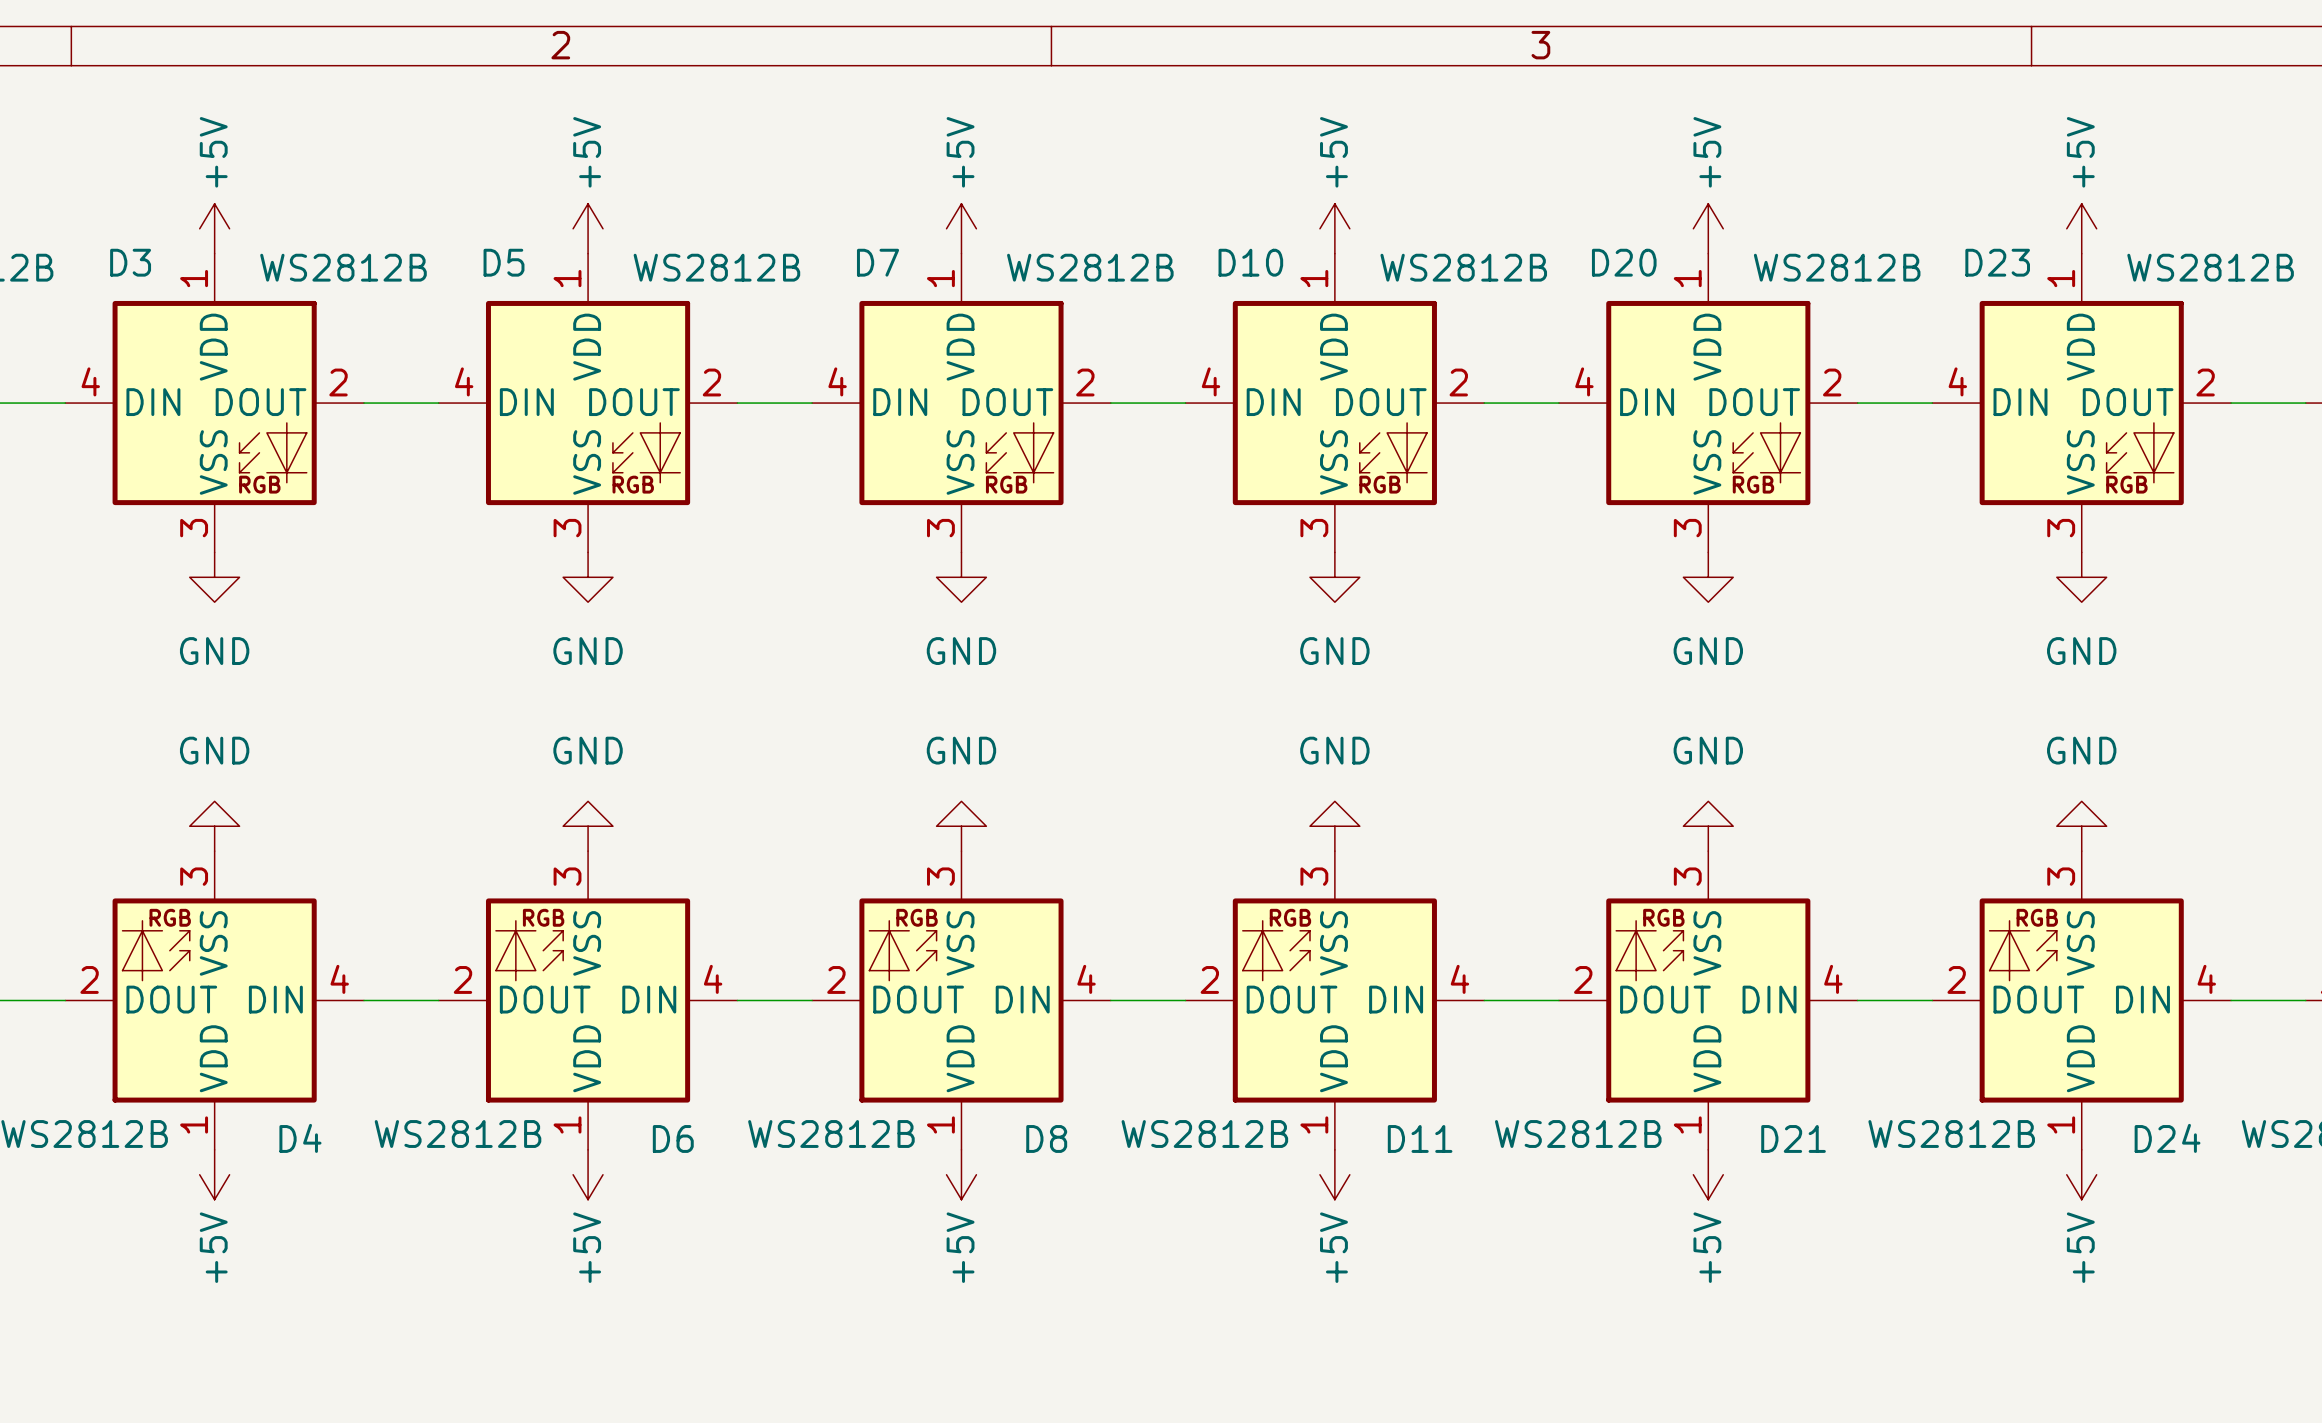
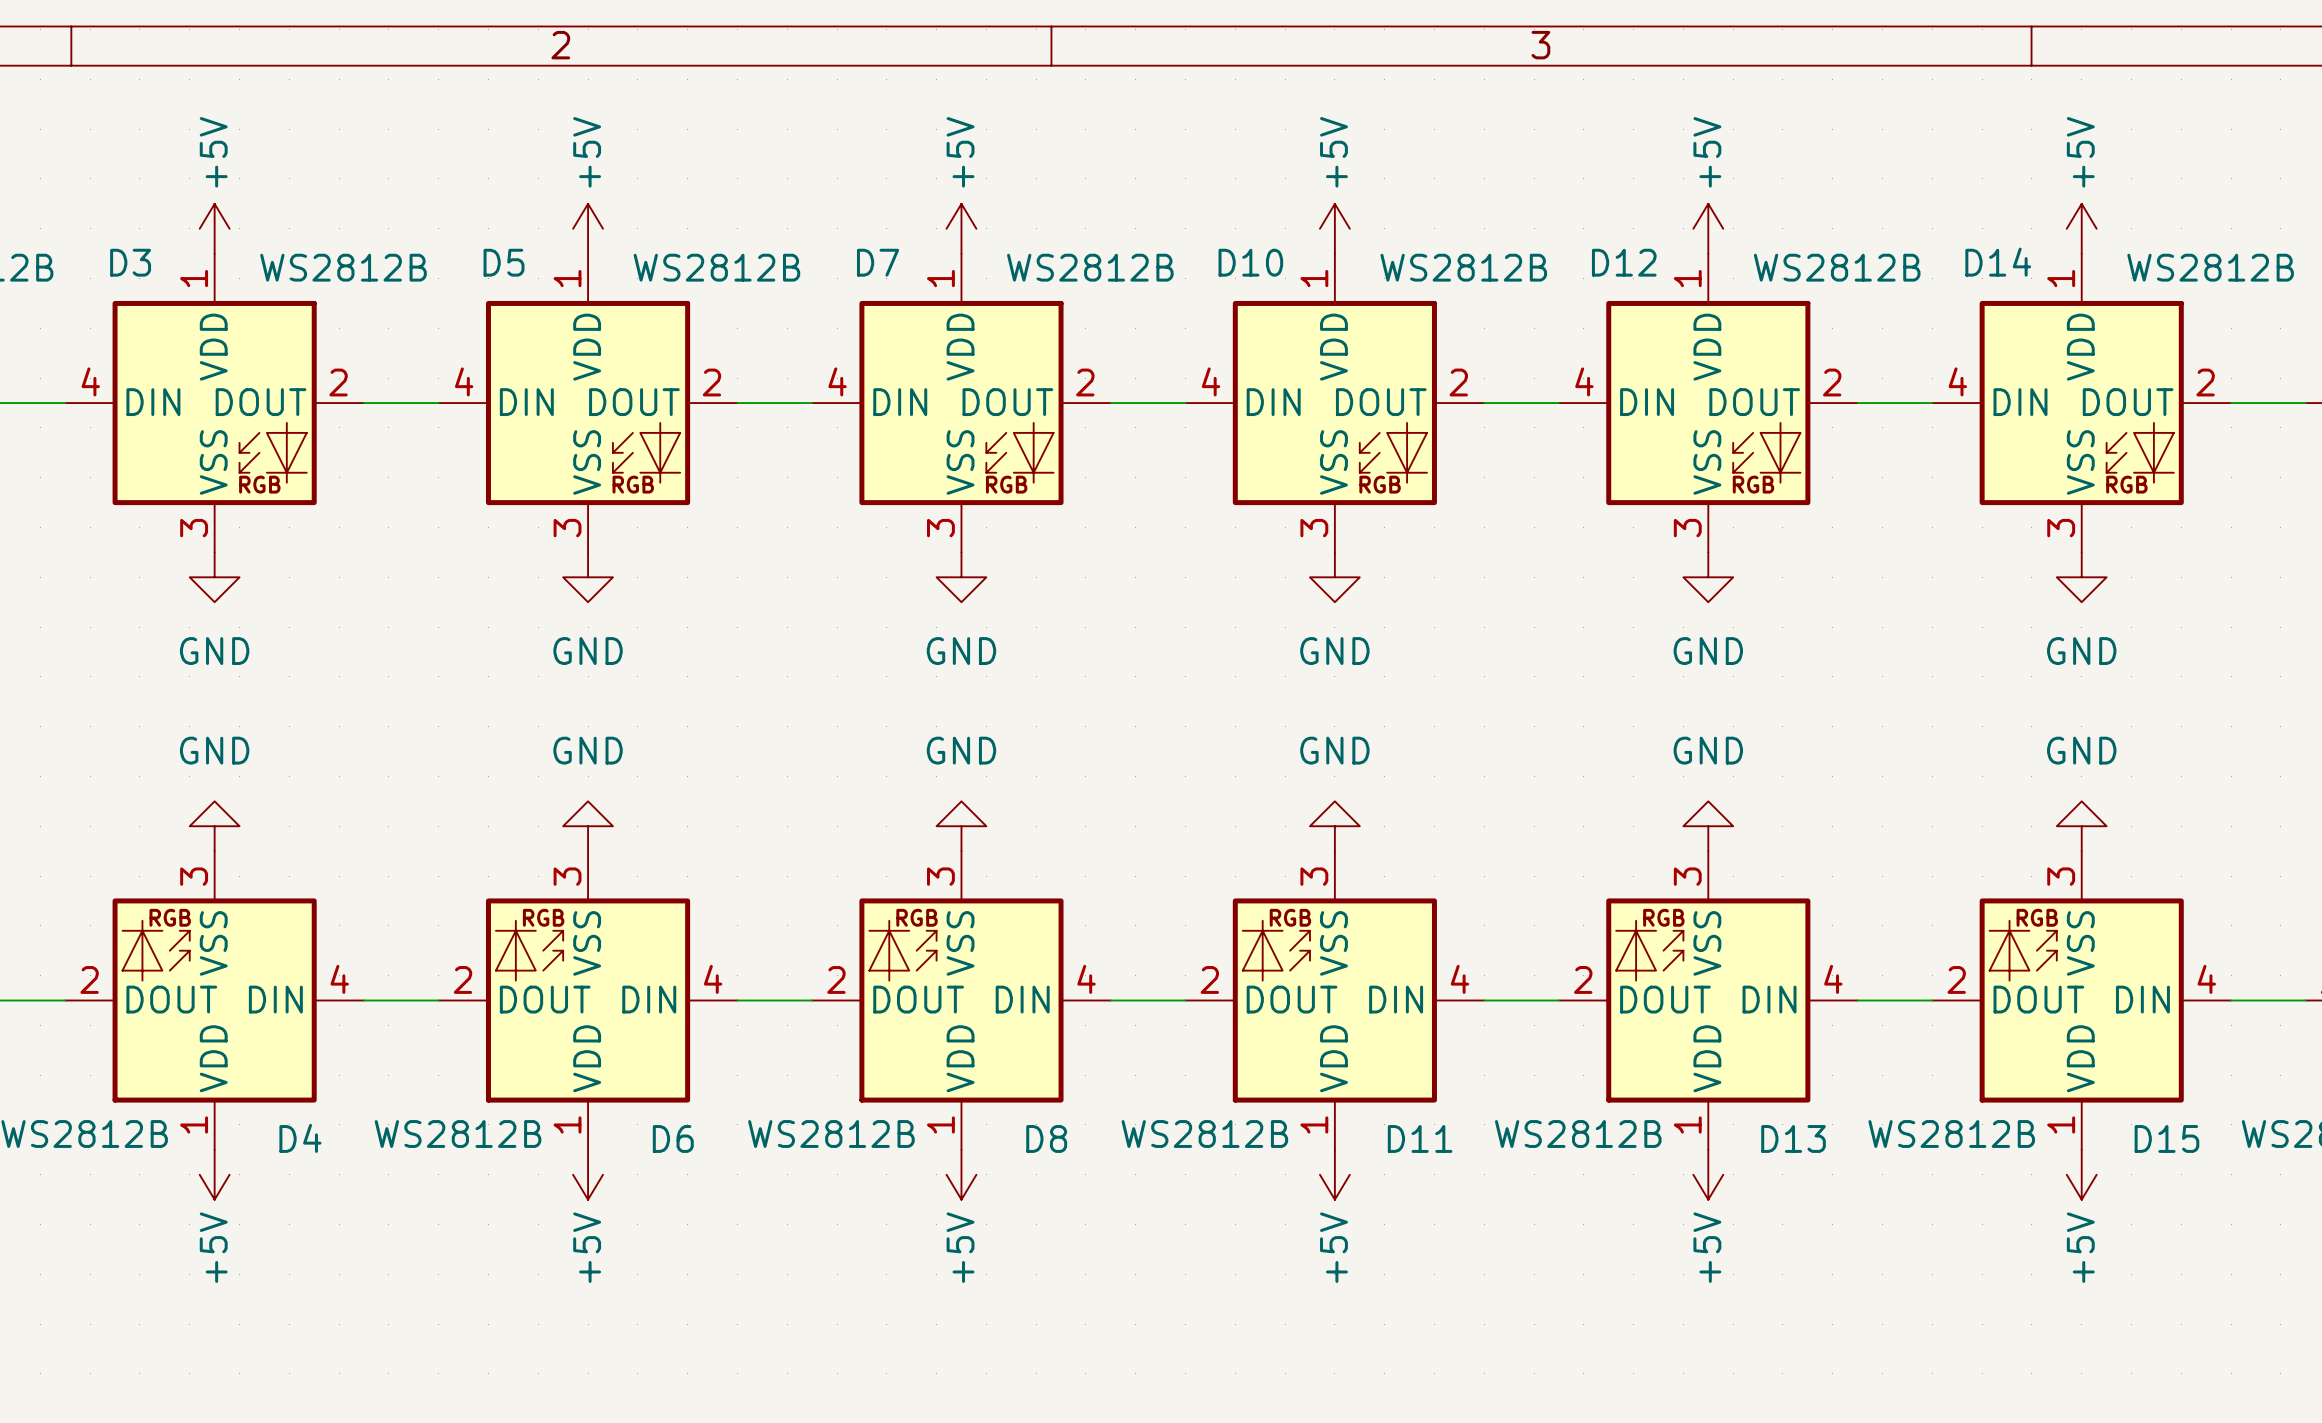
D20 name: D20 (1624, 262) -> D12 (1624, 262)
D23 name: D23 (1997, 262) -> D14 (1998, 262)
D21 name: D21 (1793, 1138) -> D13 (1793, 1138)
D24 name: D24 (2167, 1138) -> D15 (2166, 1138)

